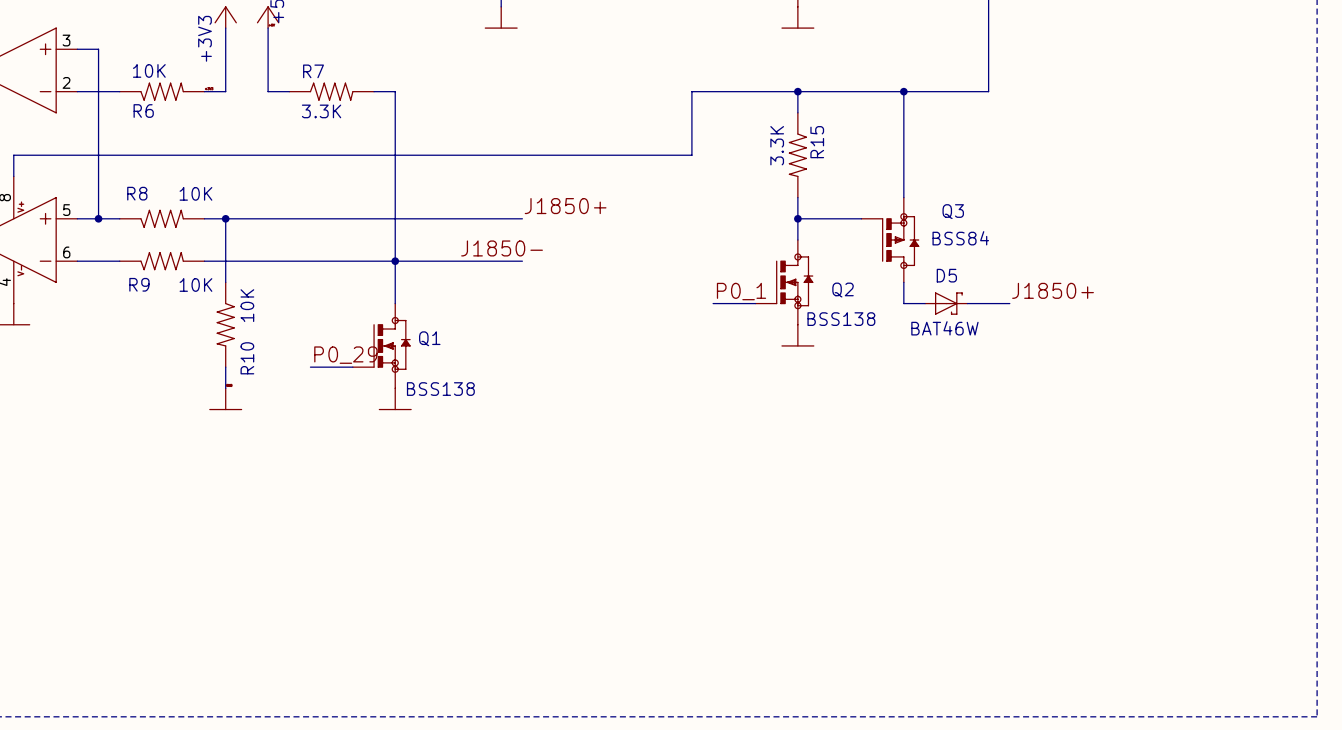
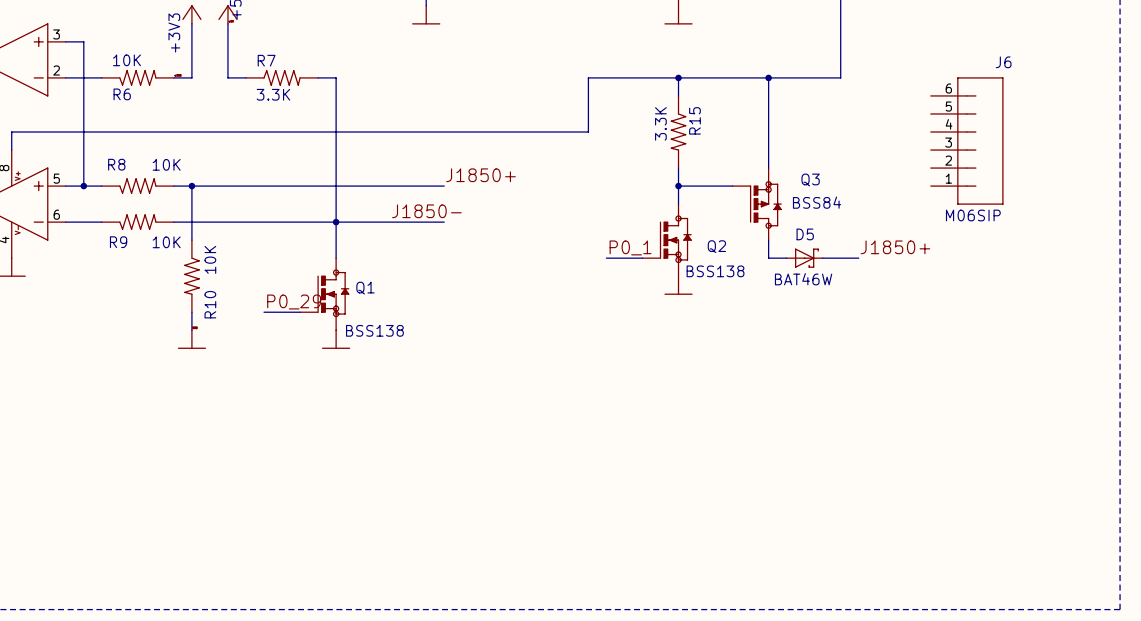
J6: none -> M06SIP (966, 141)

